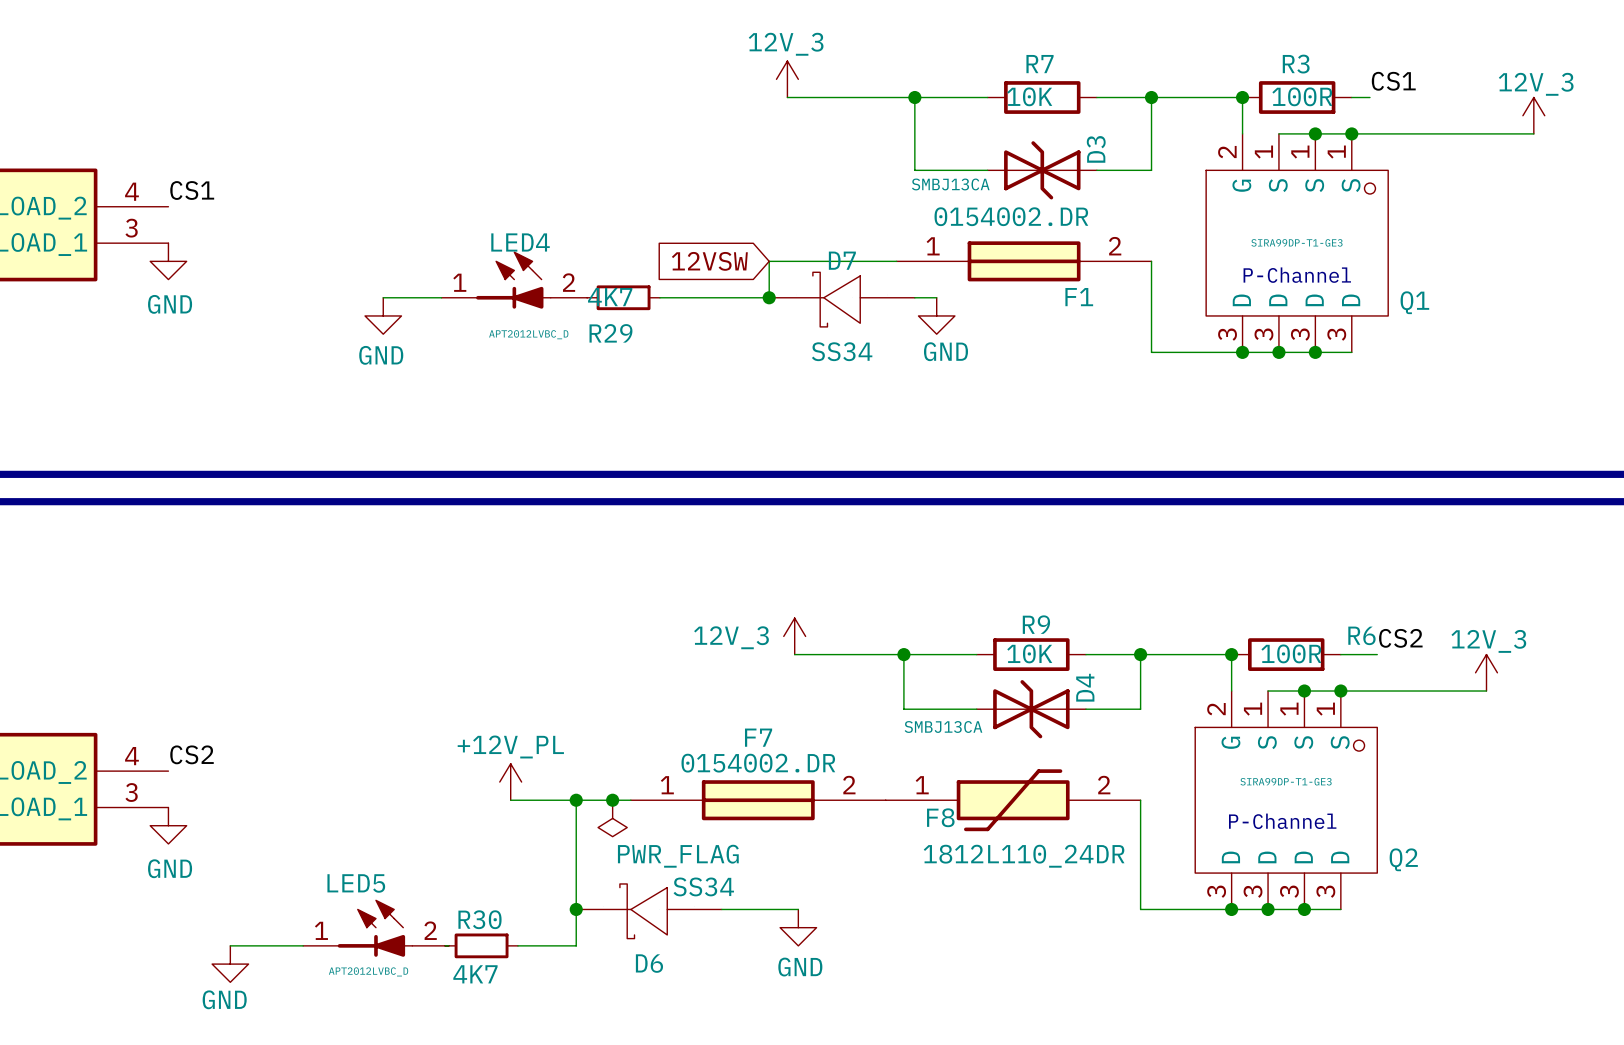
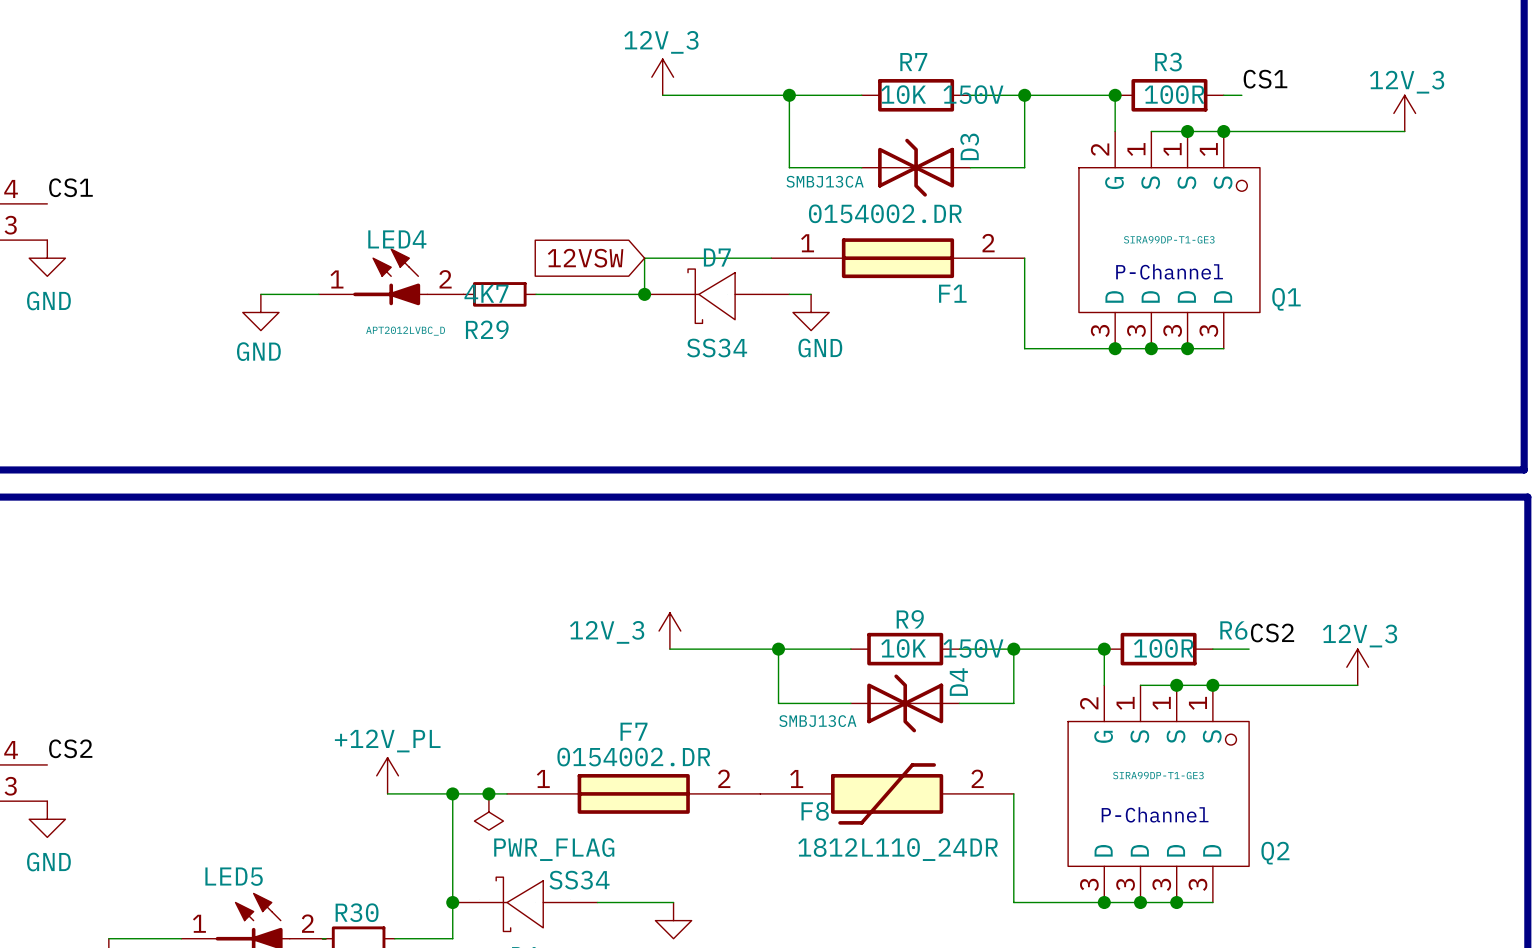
R7 value: 10K (1029, 96) -> 10K 150V (942, 94)
R9 value: 10K (1029, 653) -> 10K 150V (942, 648)

